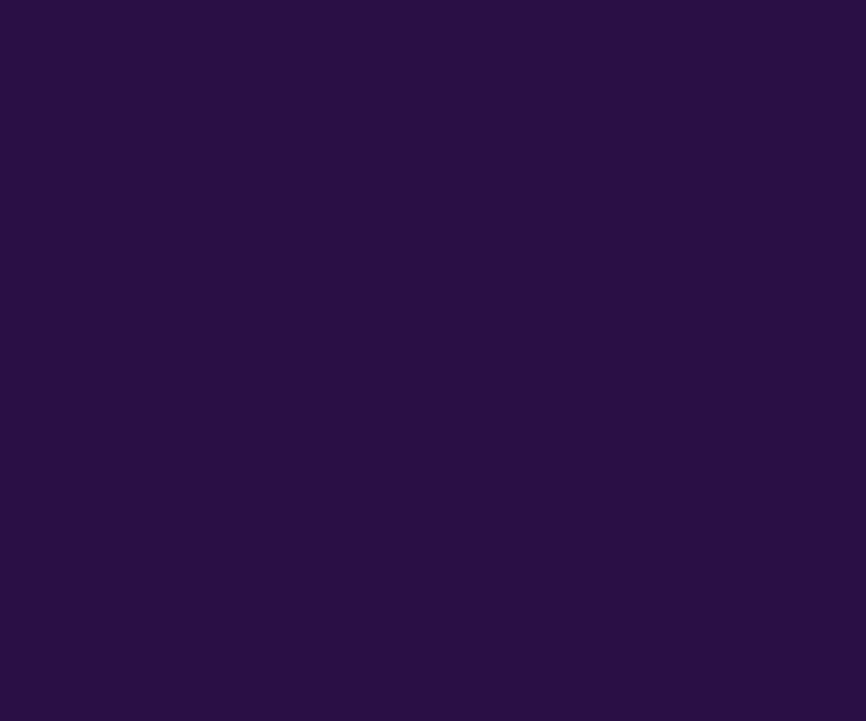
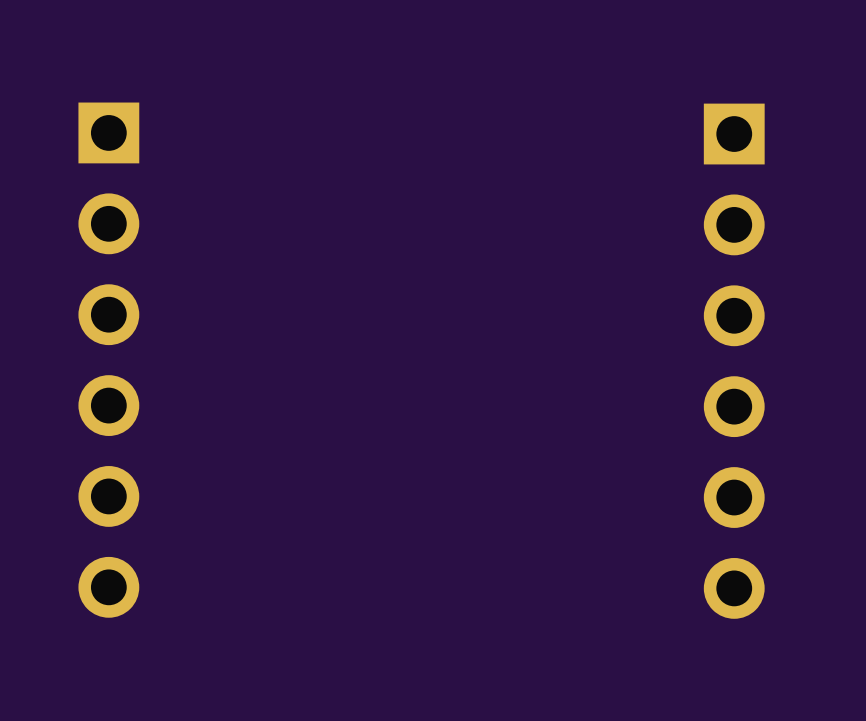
part: none -> (108, 360)
part: none -> (734, 361)

